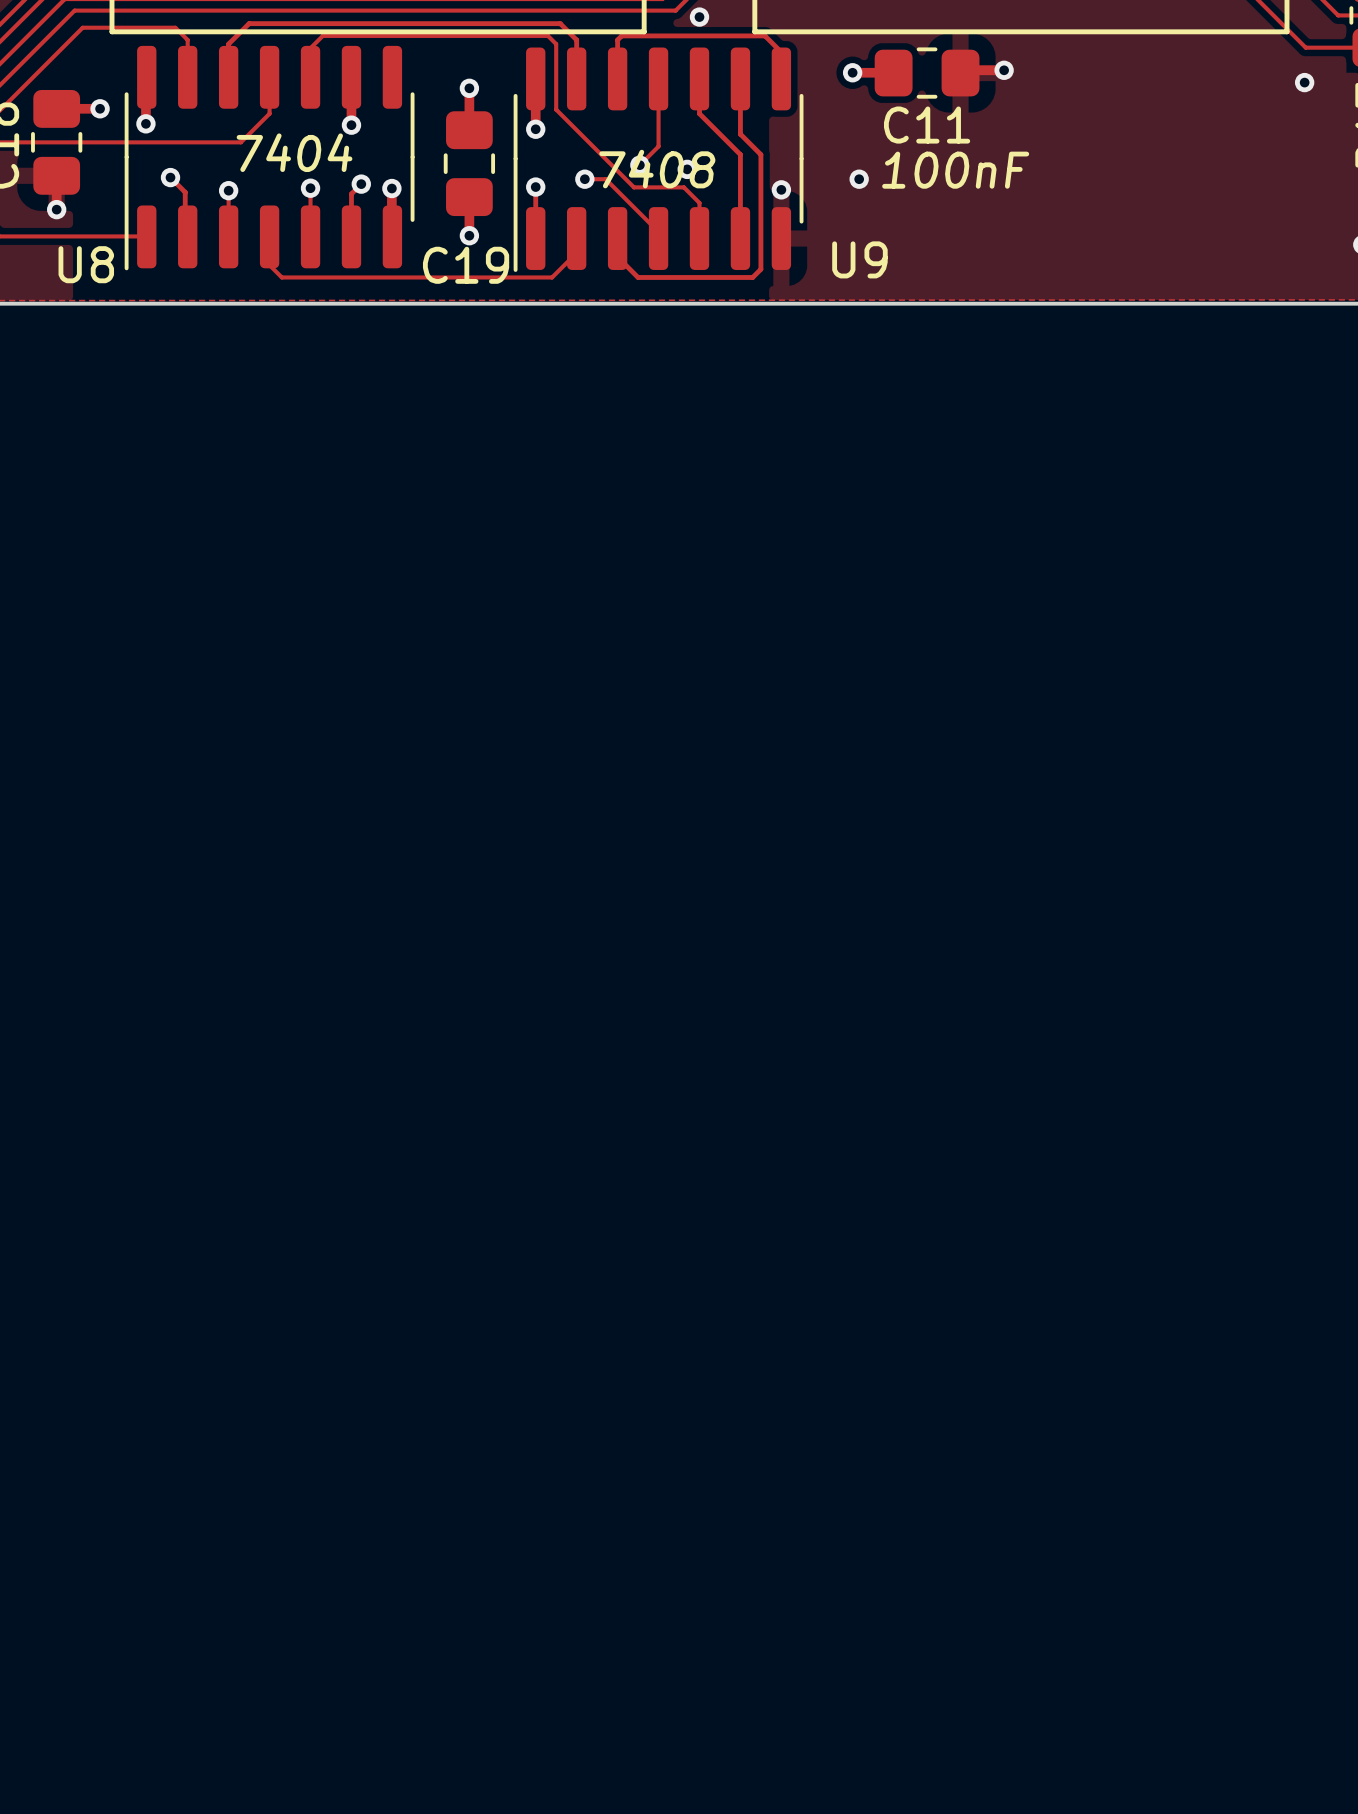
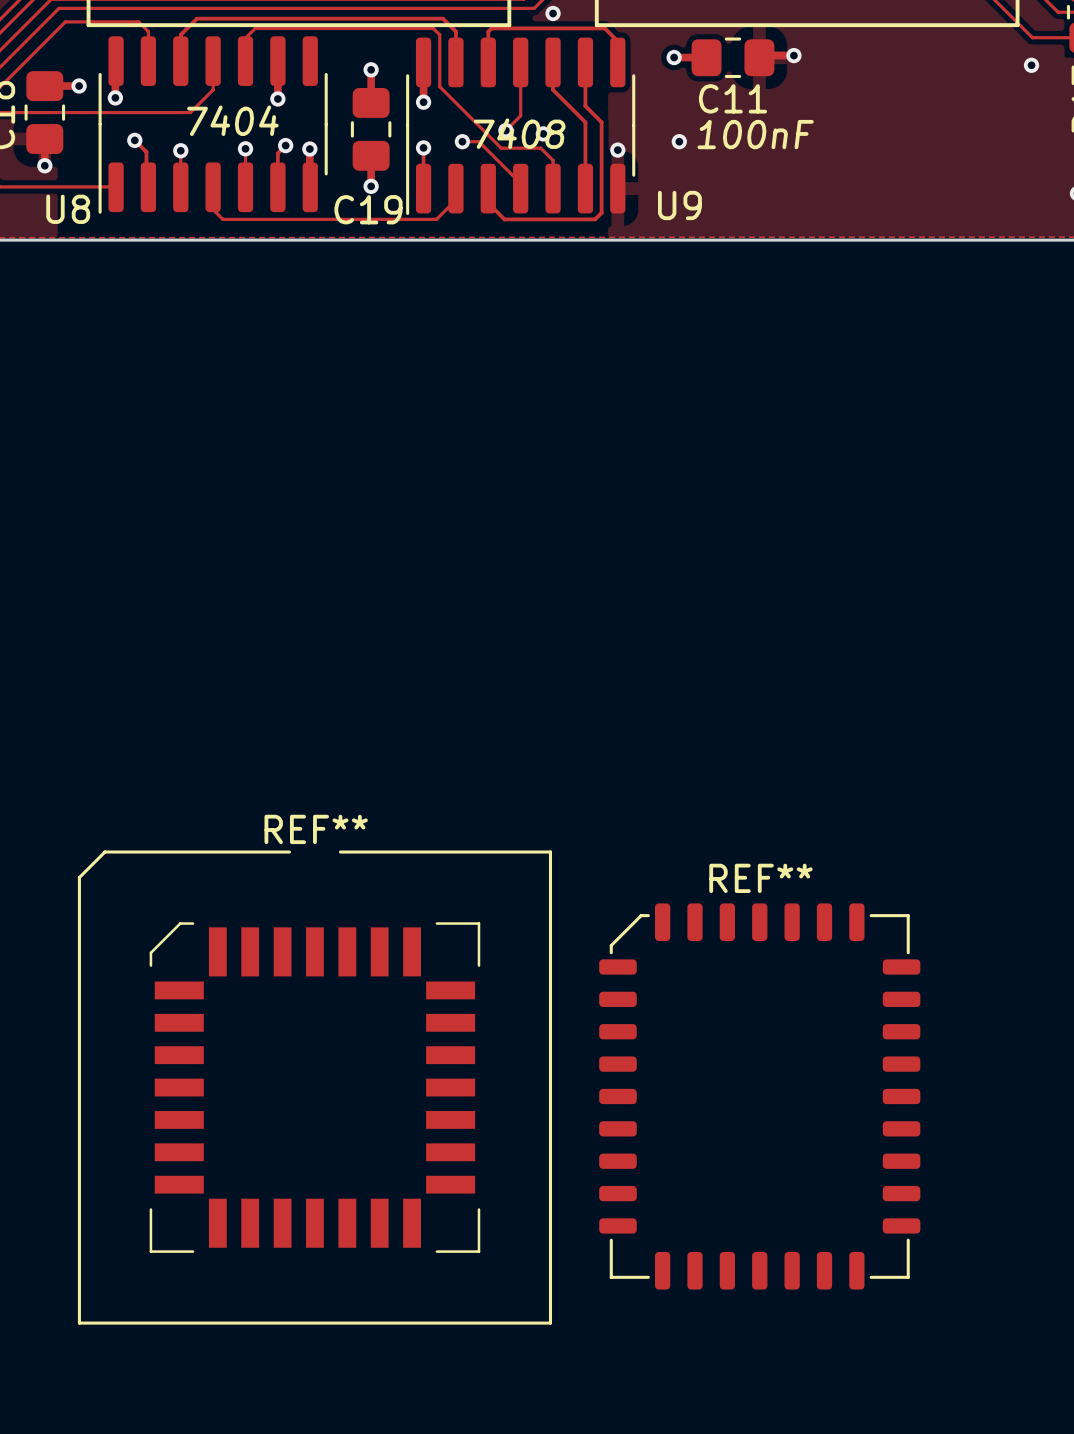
REF**: none -> (314, 1087)
REF**: none -> (759, 1096)

